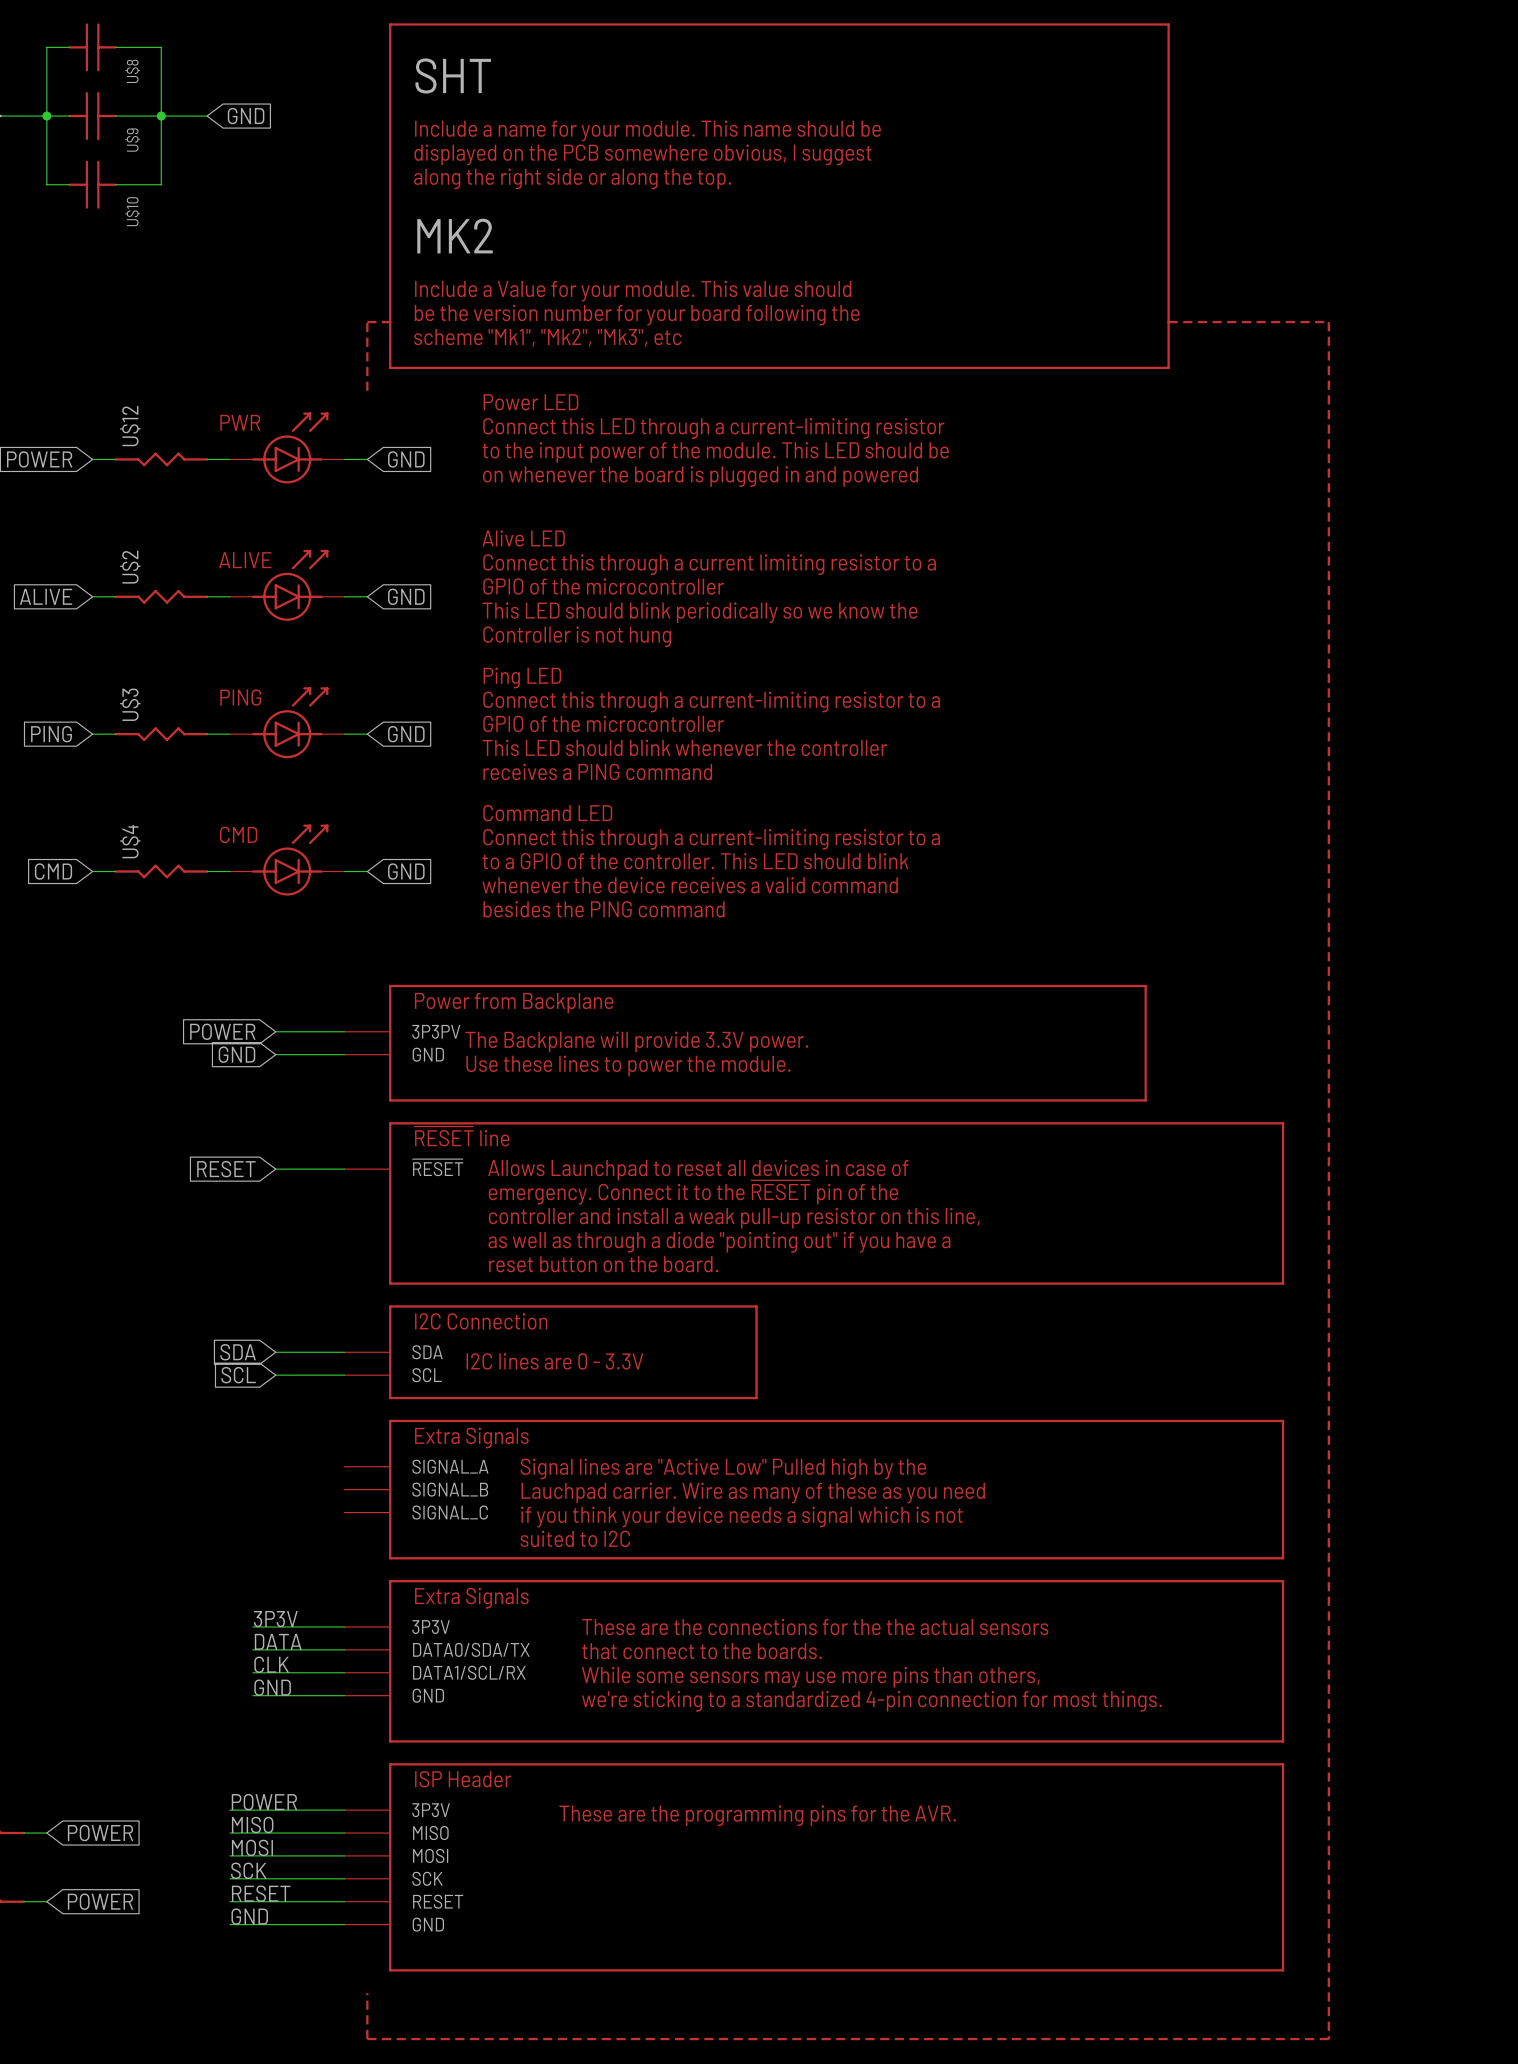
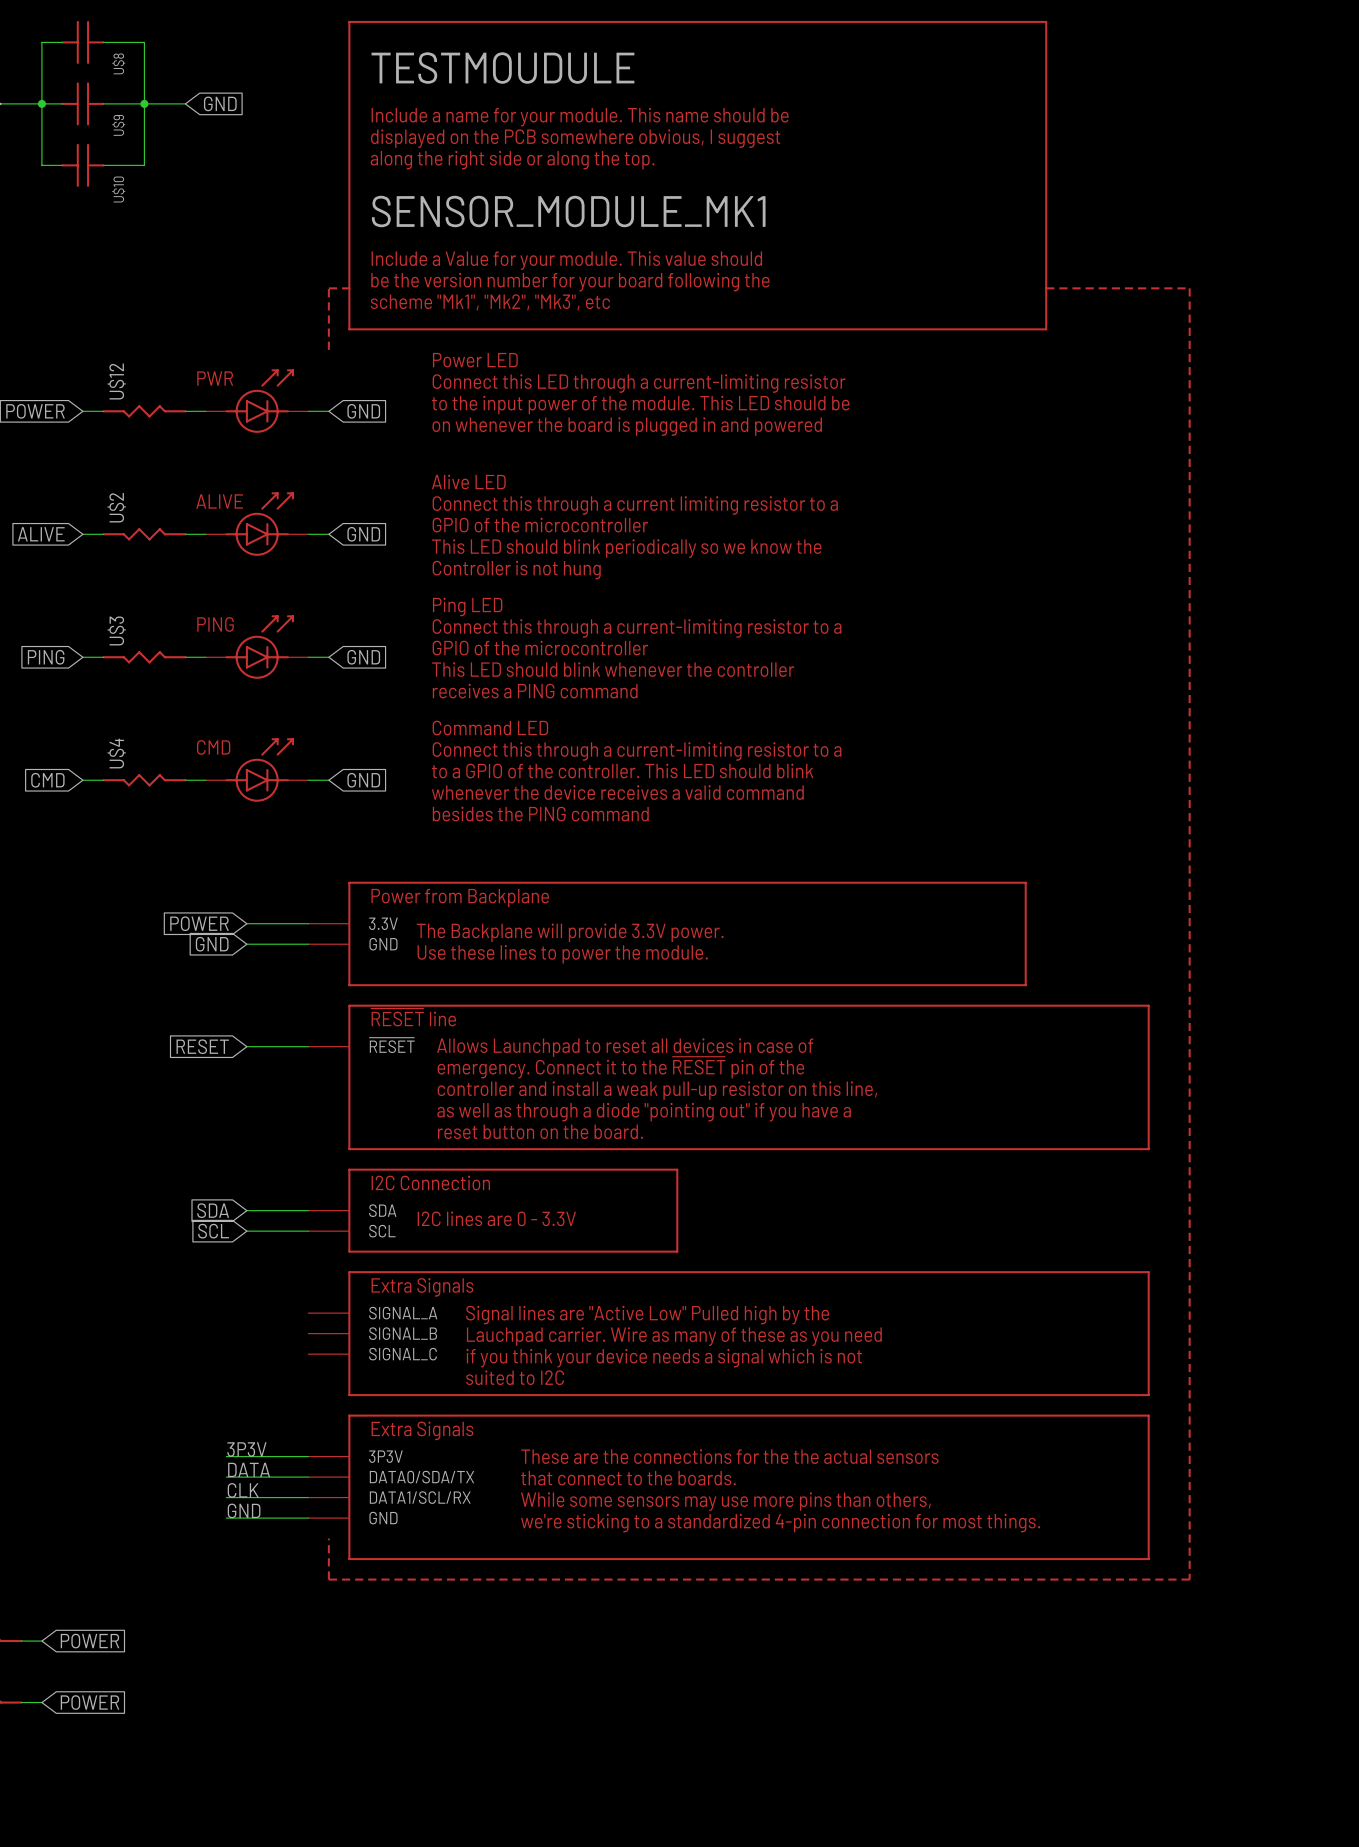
TESTMOUDULE: none -> SENSOR_MODULE_MK1 (698, 800)
SHT: MK2 (779, 1031) -> none
label: POWER (264, 1802) -> none
wire: (229, 1810) (344, 1810) -> none
label: MISO (252, 1825) -> none
wire: (229, 1833) (344, 1833) -> none
label: MOSI (252, 1847) -> none
wire: (229, 1855) (344, 1855) -> none
label: SCK (248, 1870) -> none
wire: (229, 1878) (344, 1878) -> none
label: RESET (261, 1893) -> none
wire: (229, 1901) (344, 1901) -> none
label: GND (249, 1916) -> none
wire: (229, 1924) (344, 1924) -> none

